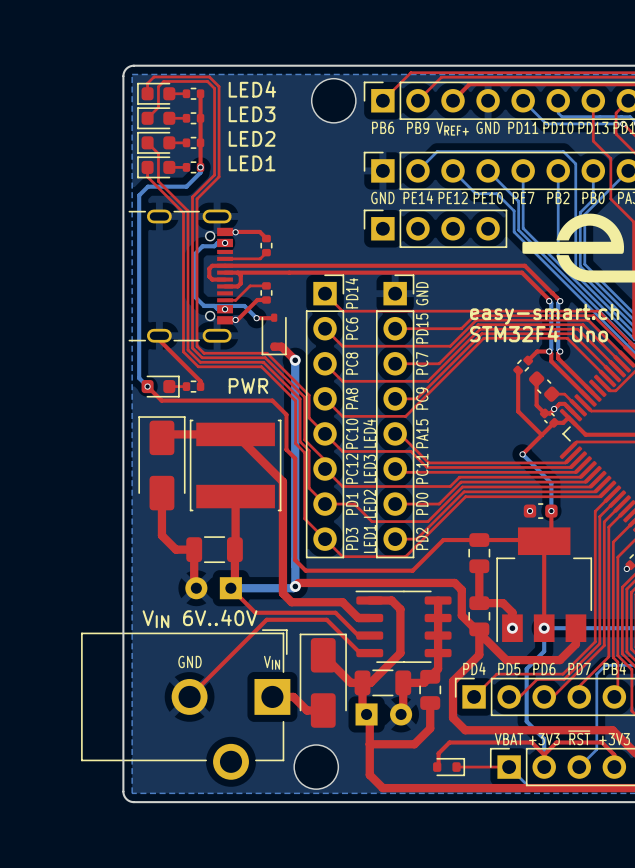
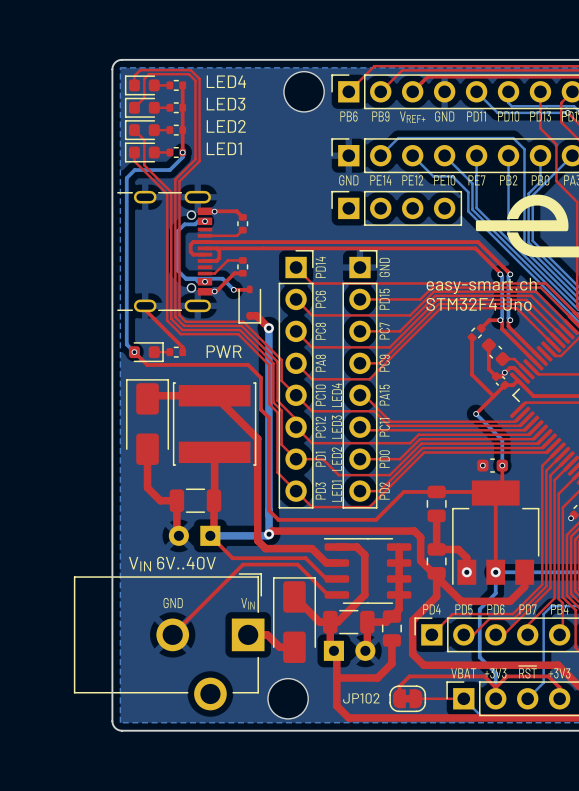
JP102: none -> (407, 698)
part: (449, 767) -> none

